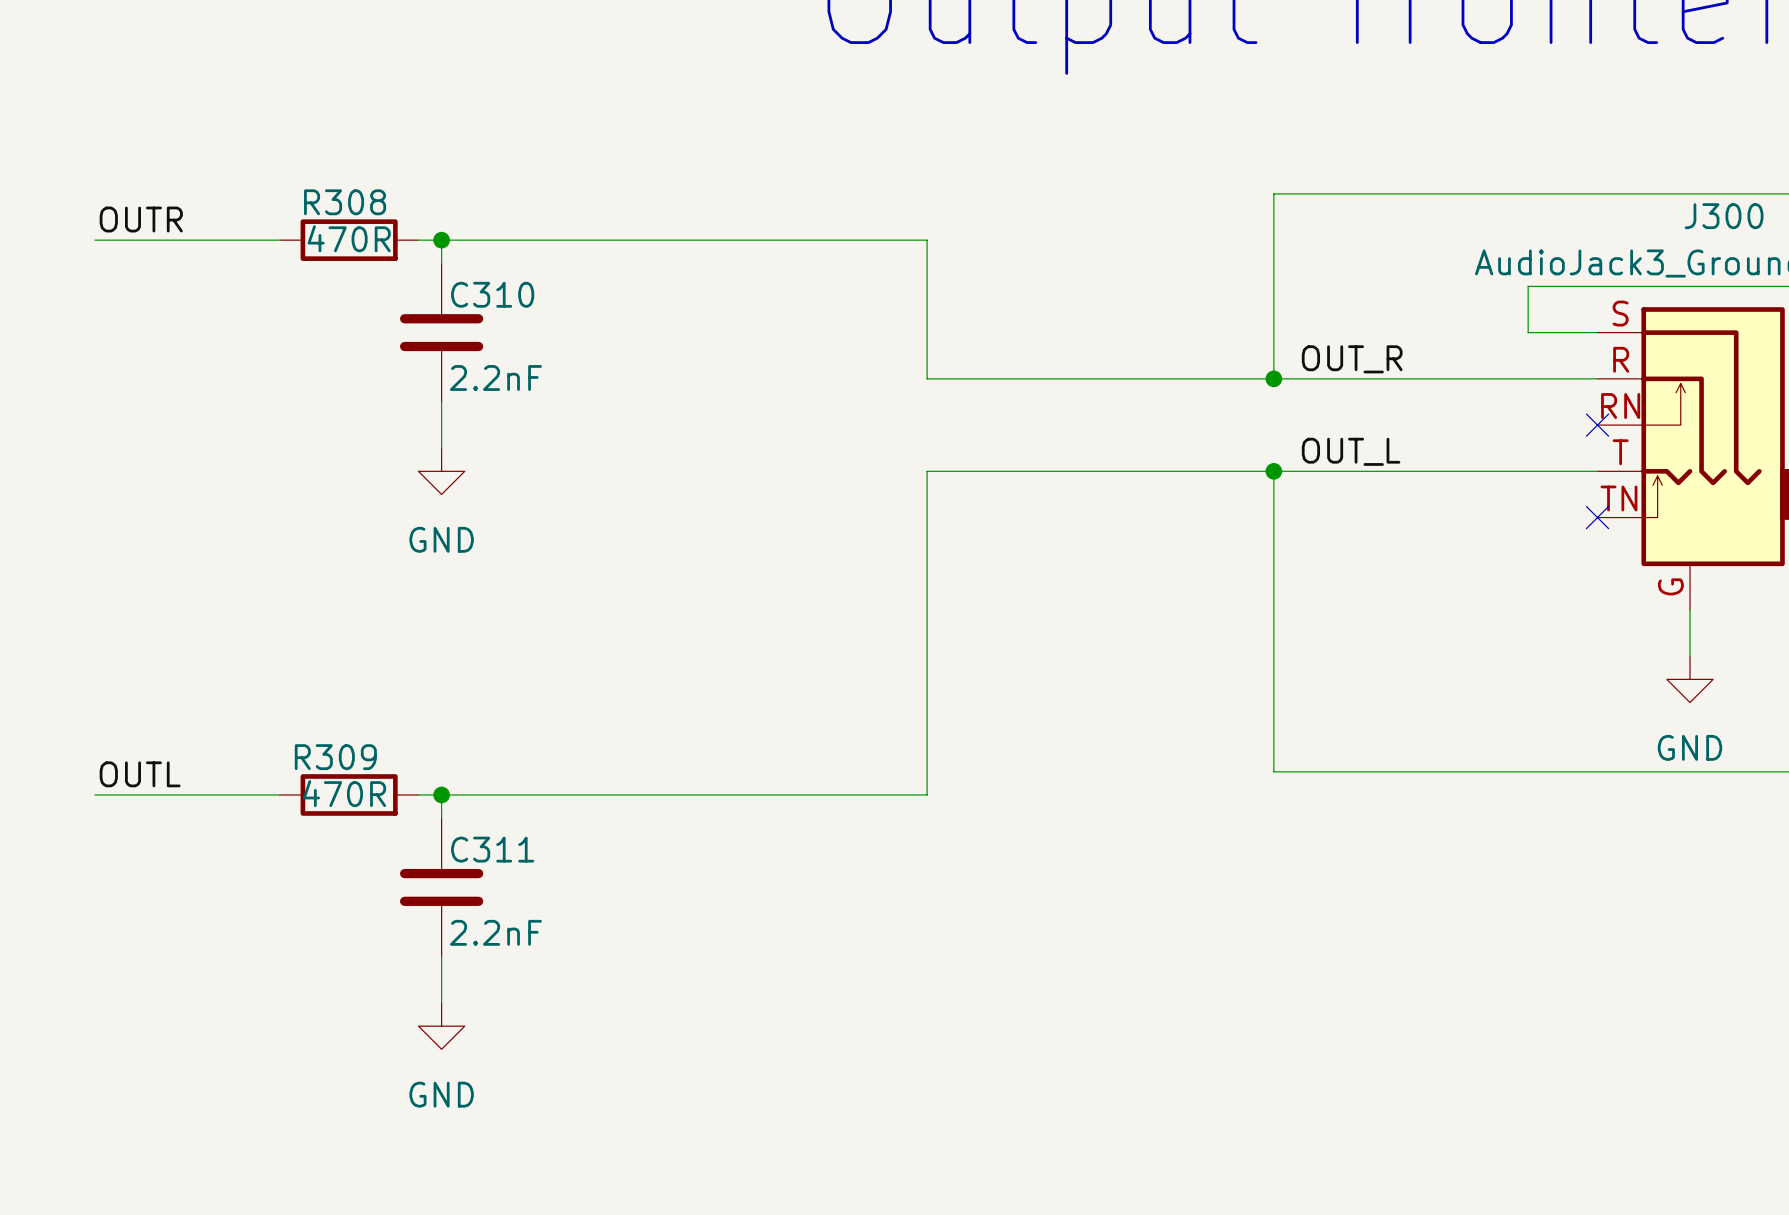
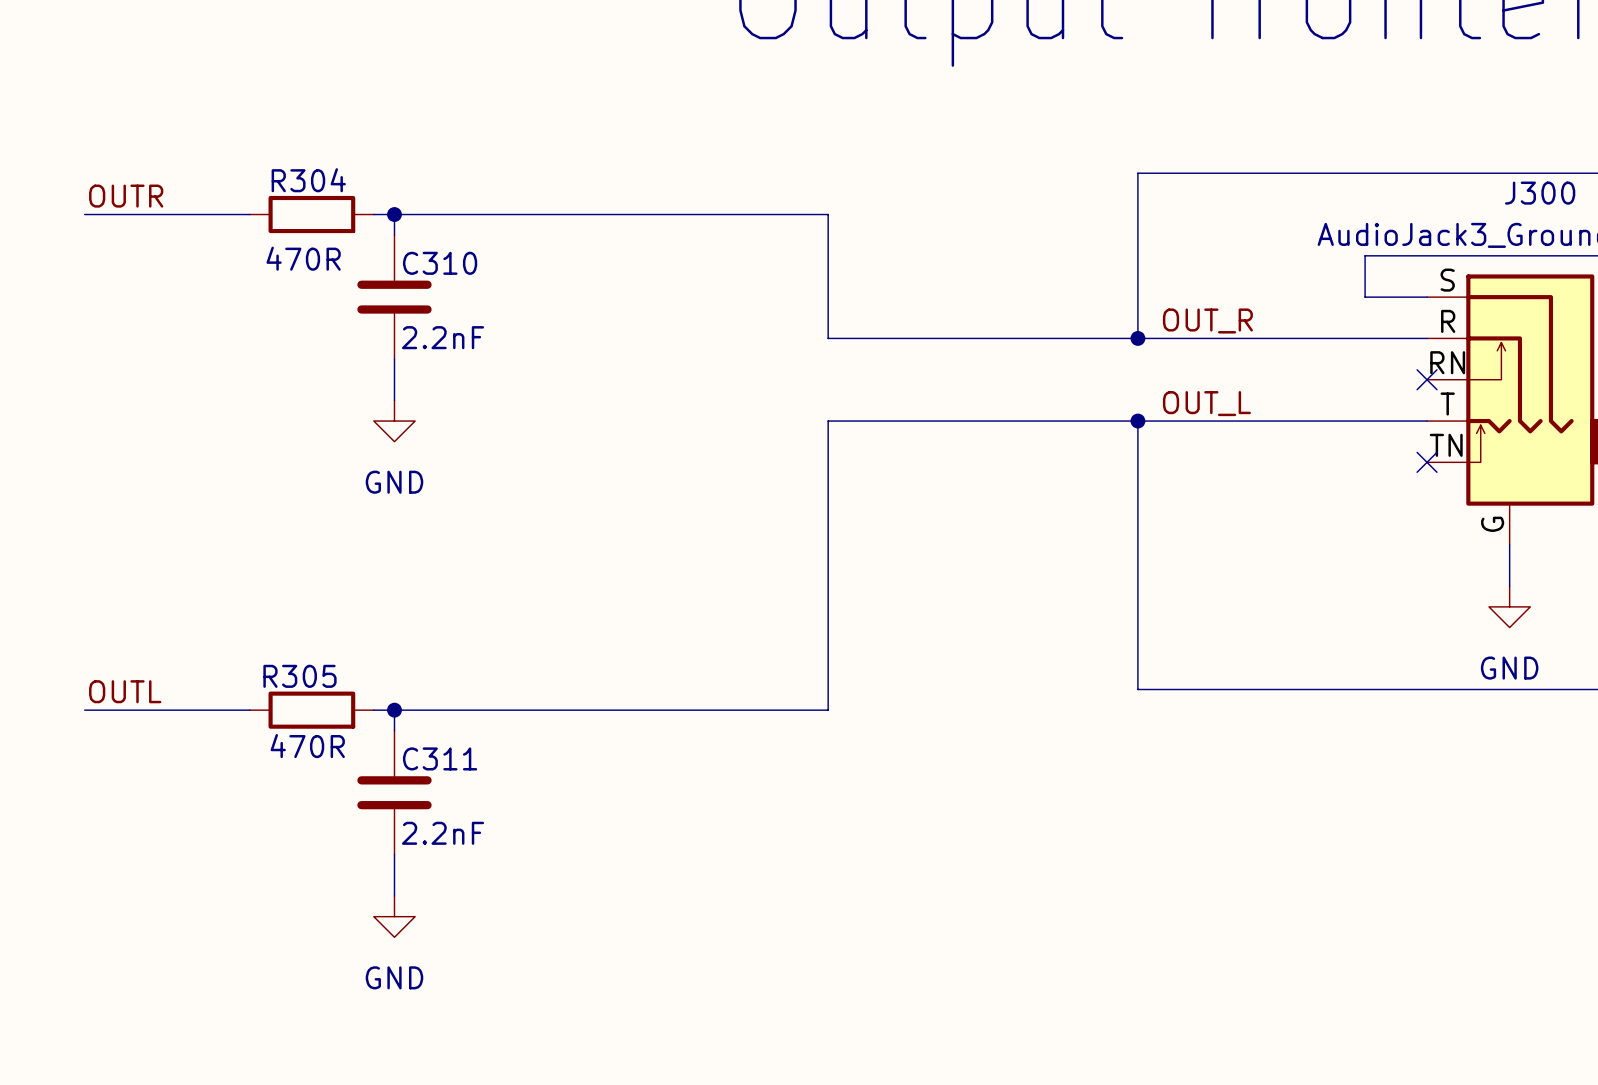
R308 name: R308 (345, 202) -> R304 (308, 180)
R308 value position: 470R (349, 238) -> 470R (303, 258)
R309 name: R309 (335, 757) -> R305 (299, 676)
R309 value position: 470R (344, 793) -> 470R (307, 746)

